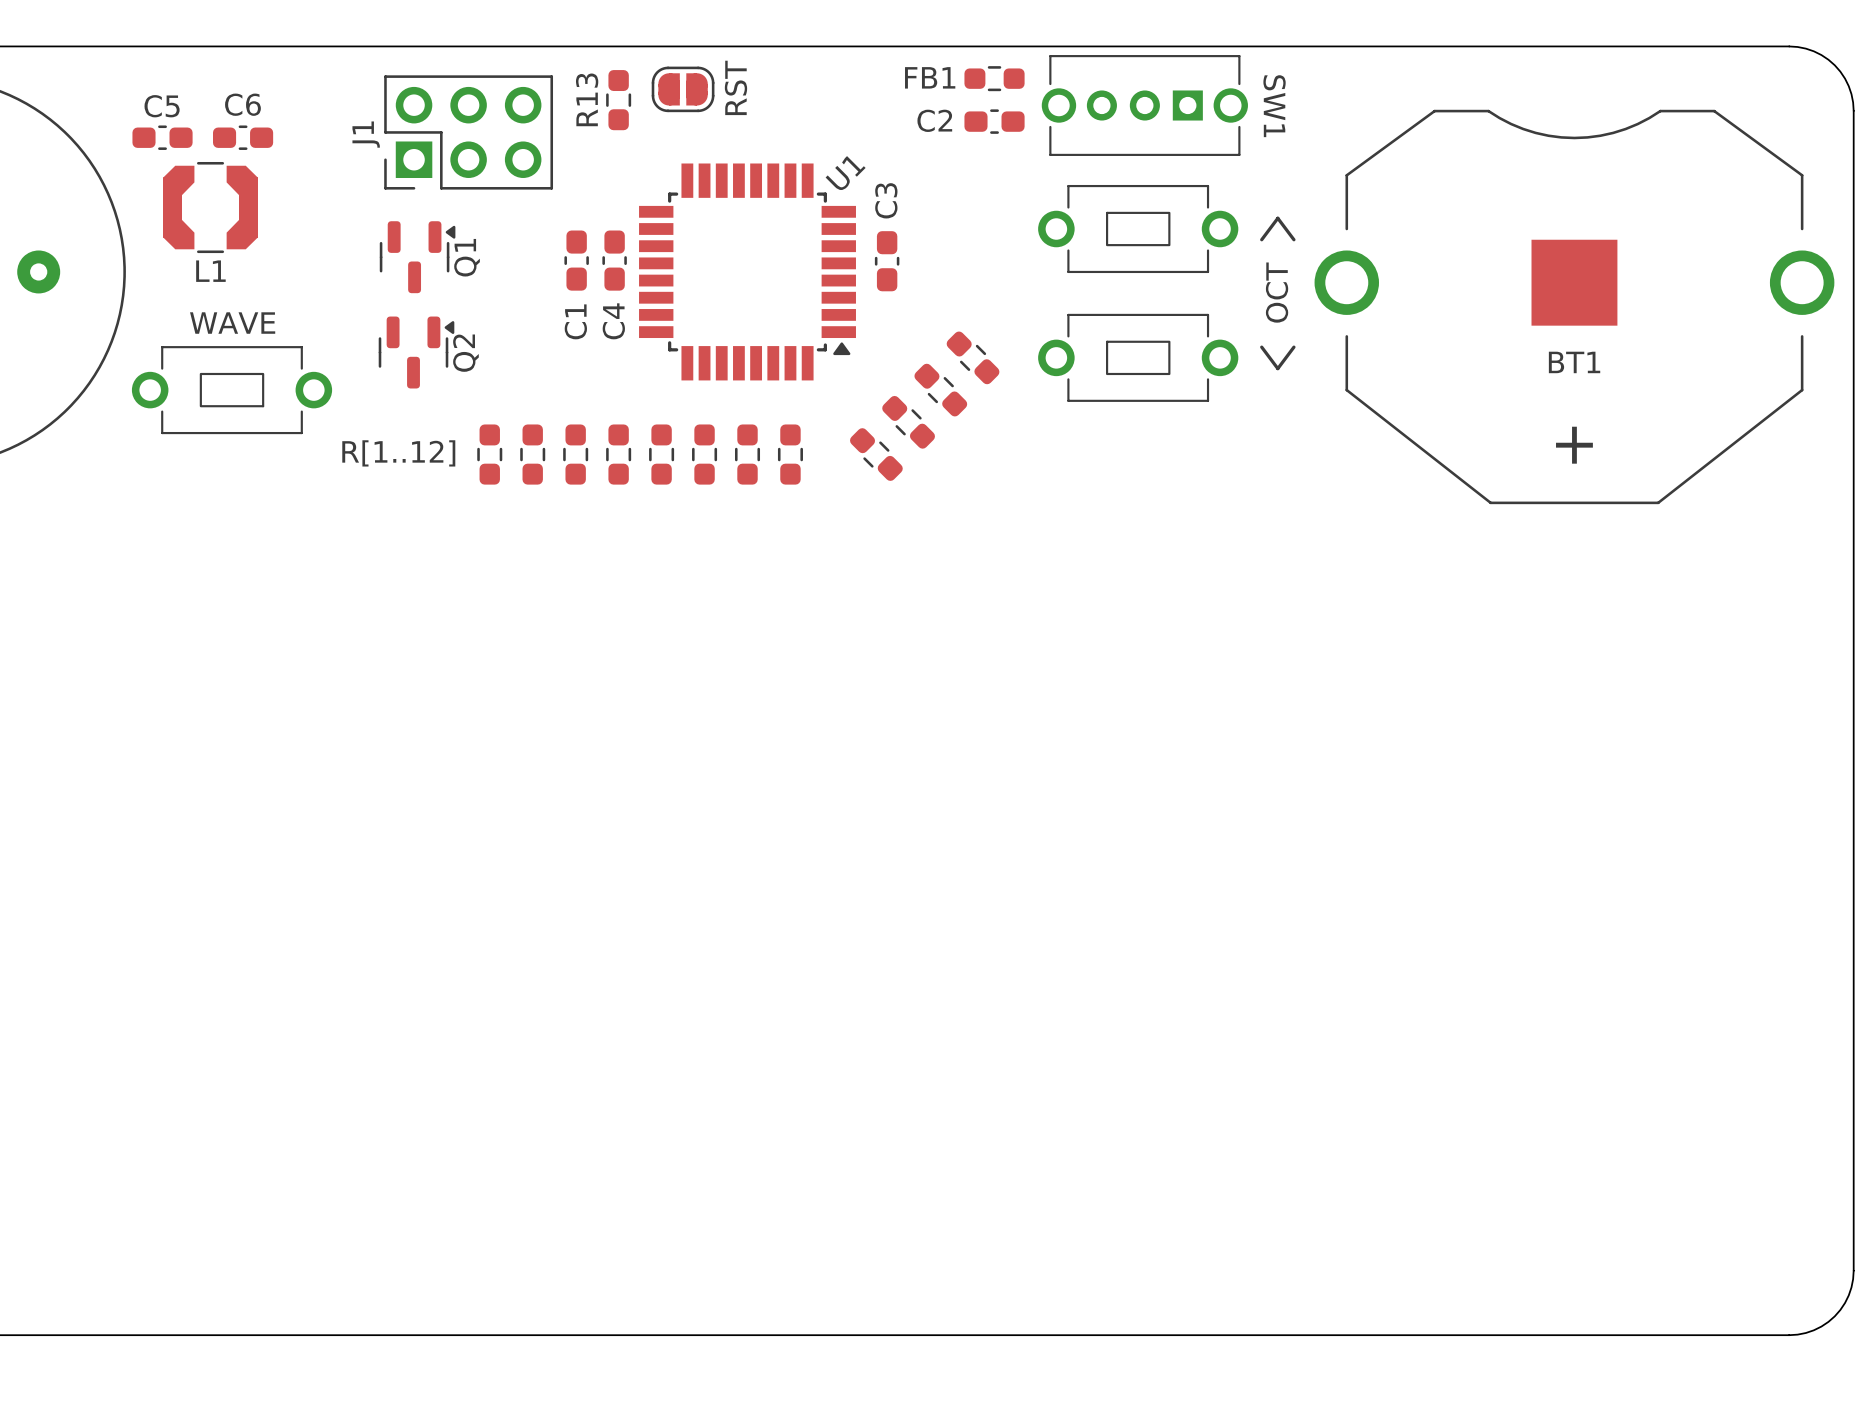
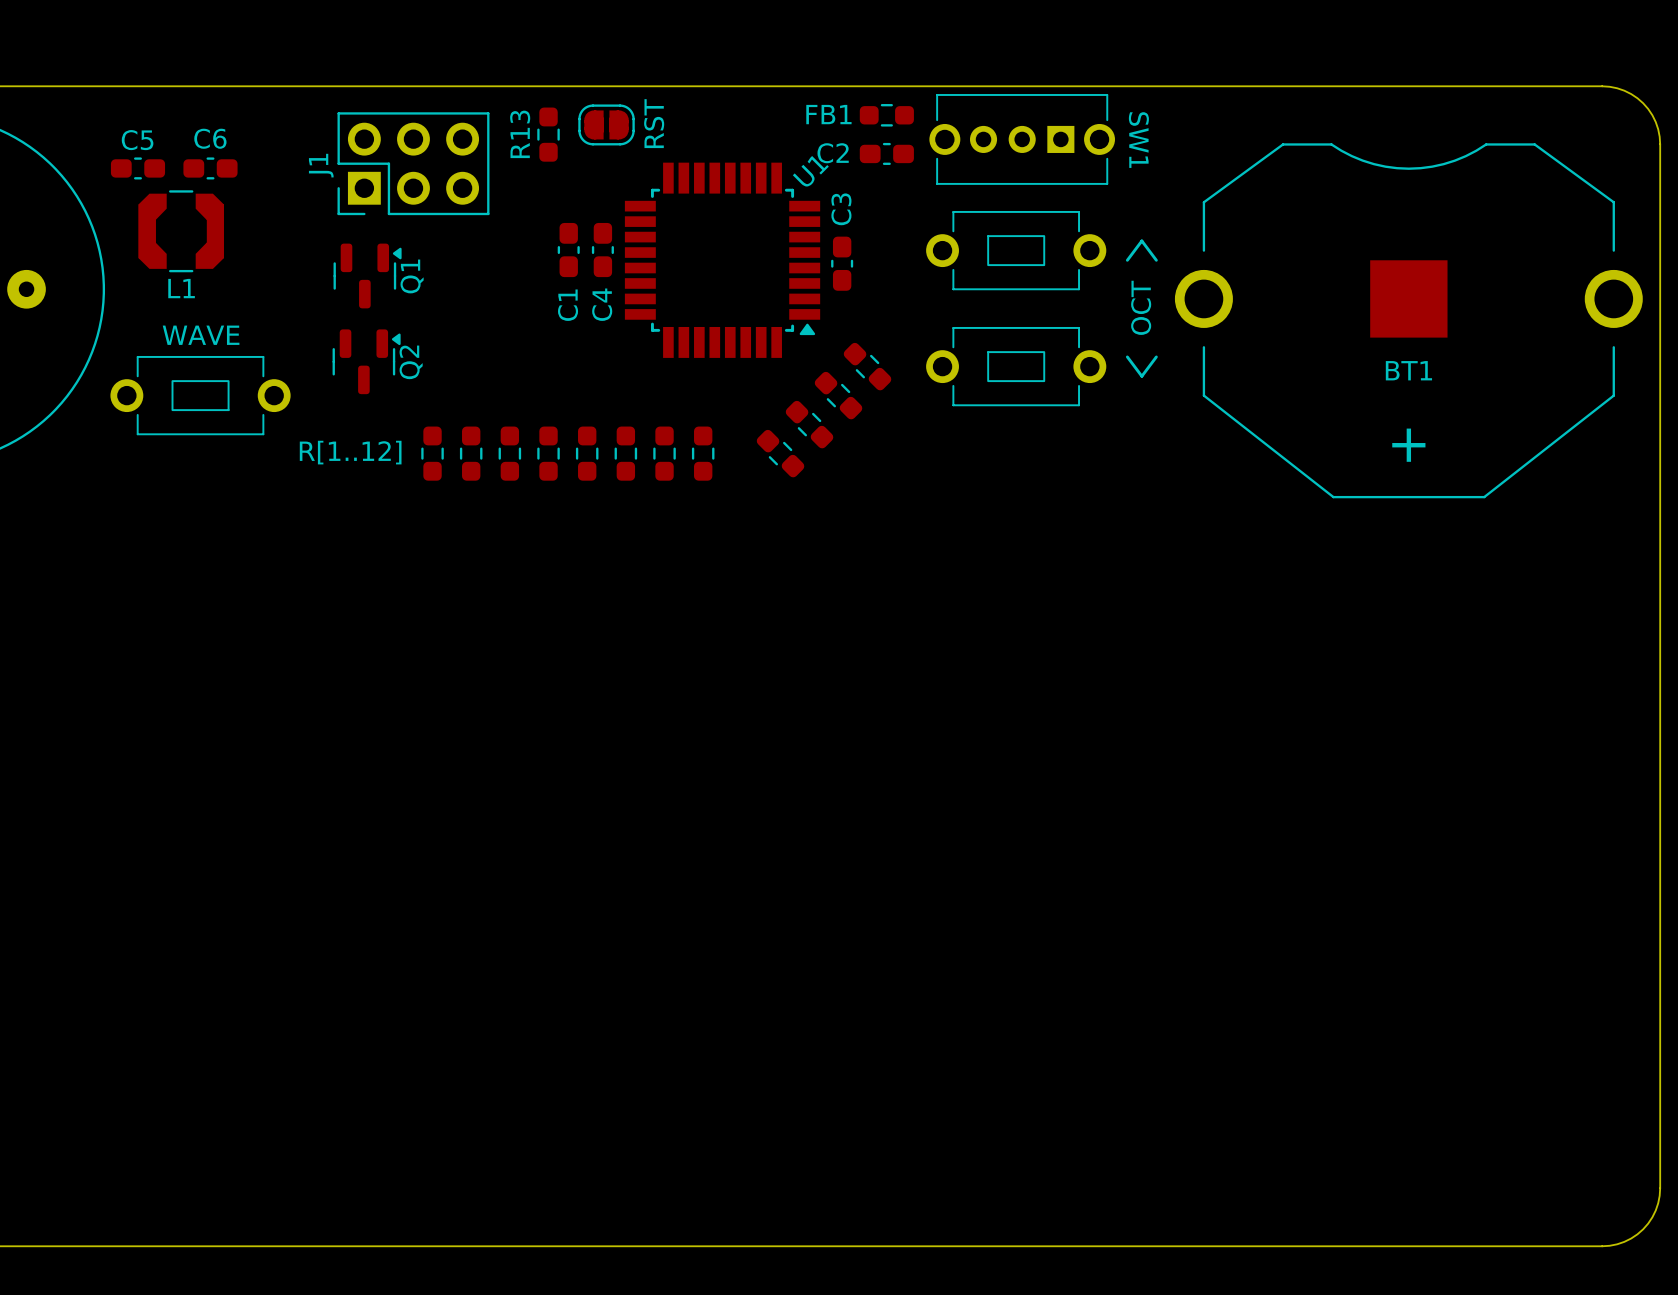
C1 position: (576, 260) -> (568, 250)
C4 position: (614, 260) -> (602, 250)
C3 position: (887, 261) -> (842, 263)
U1 position: (747, 271) -> (722, 260)

